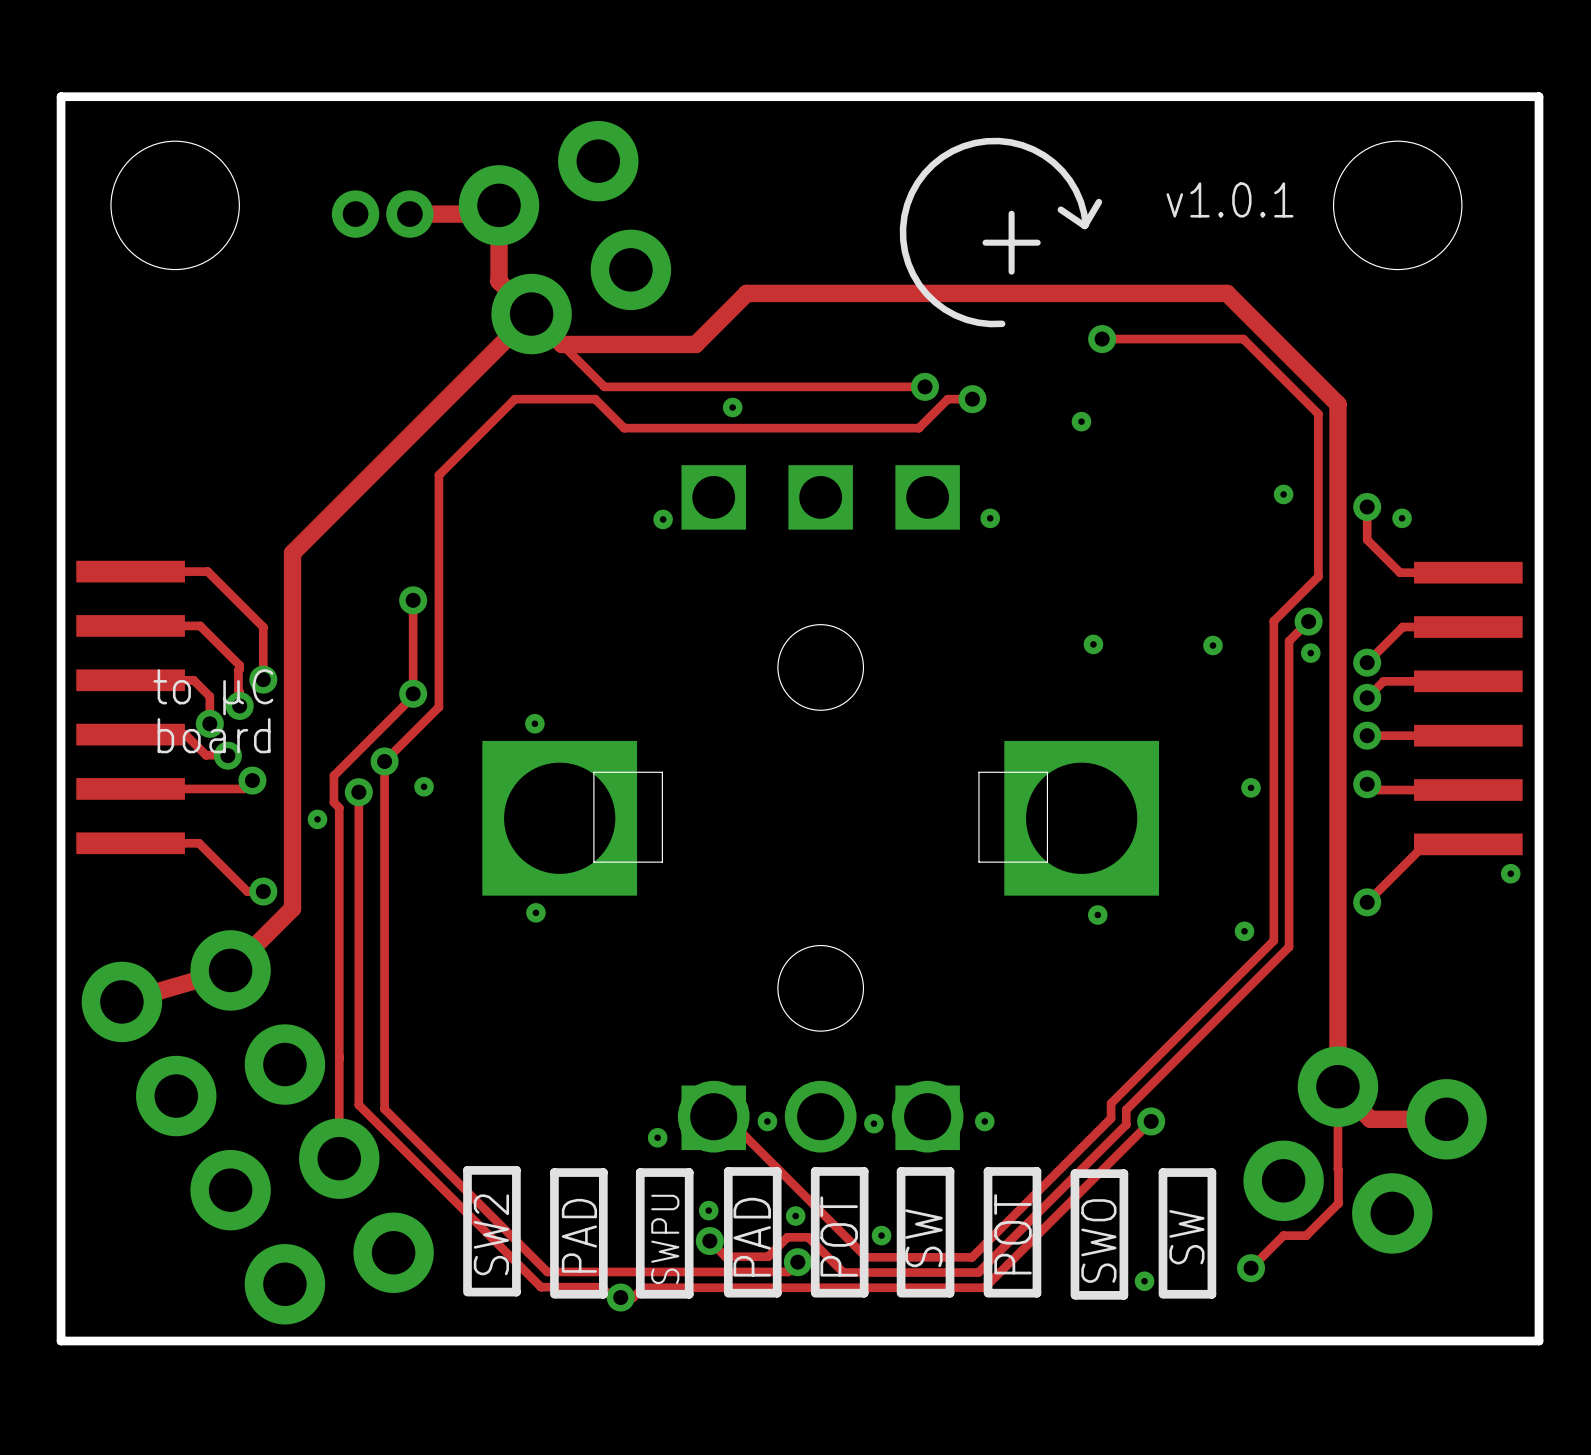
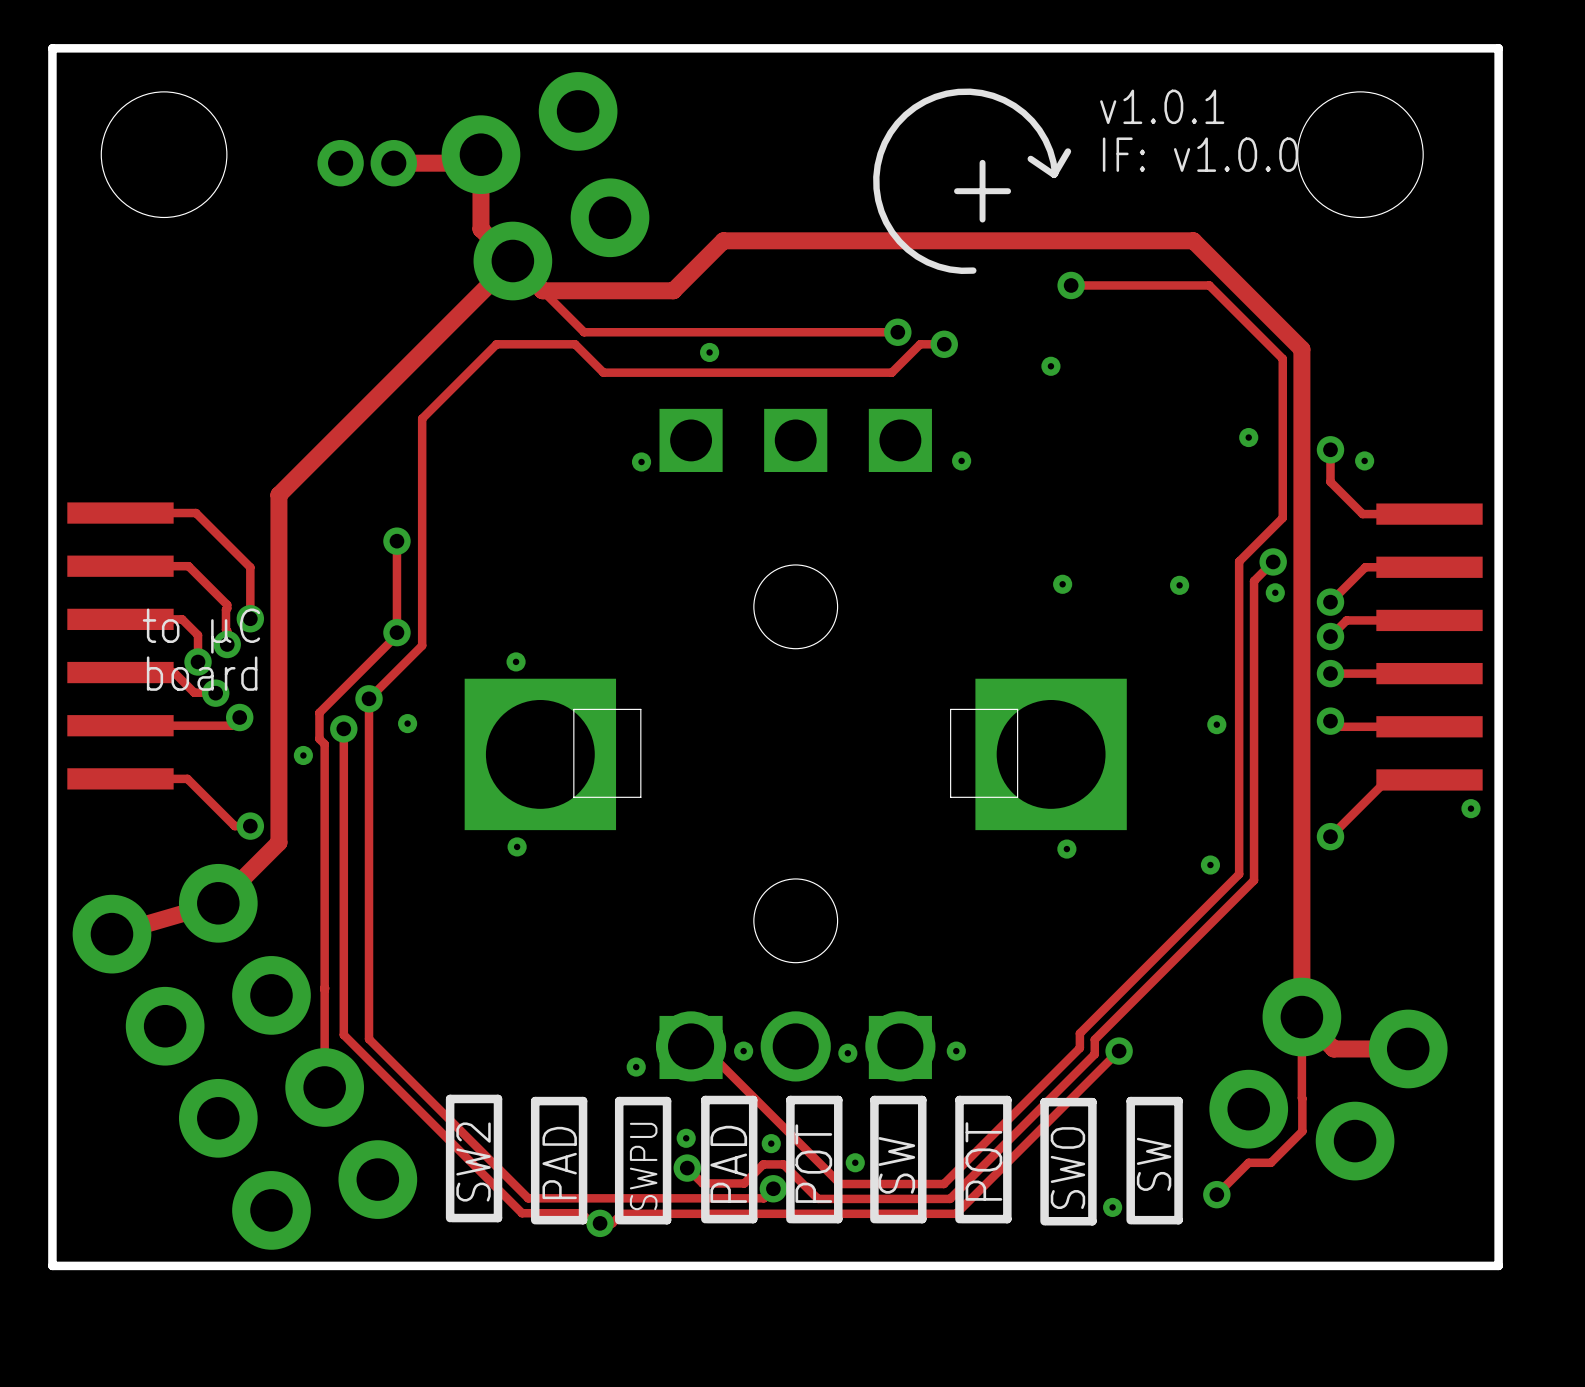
text position: v1.0.1 (1229, 199) -> v1.0.1 (1162, 106)
text: none -> IF: v1.0.0 (1200, 154)

